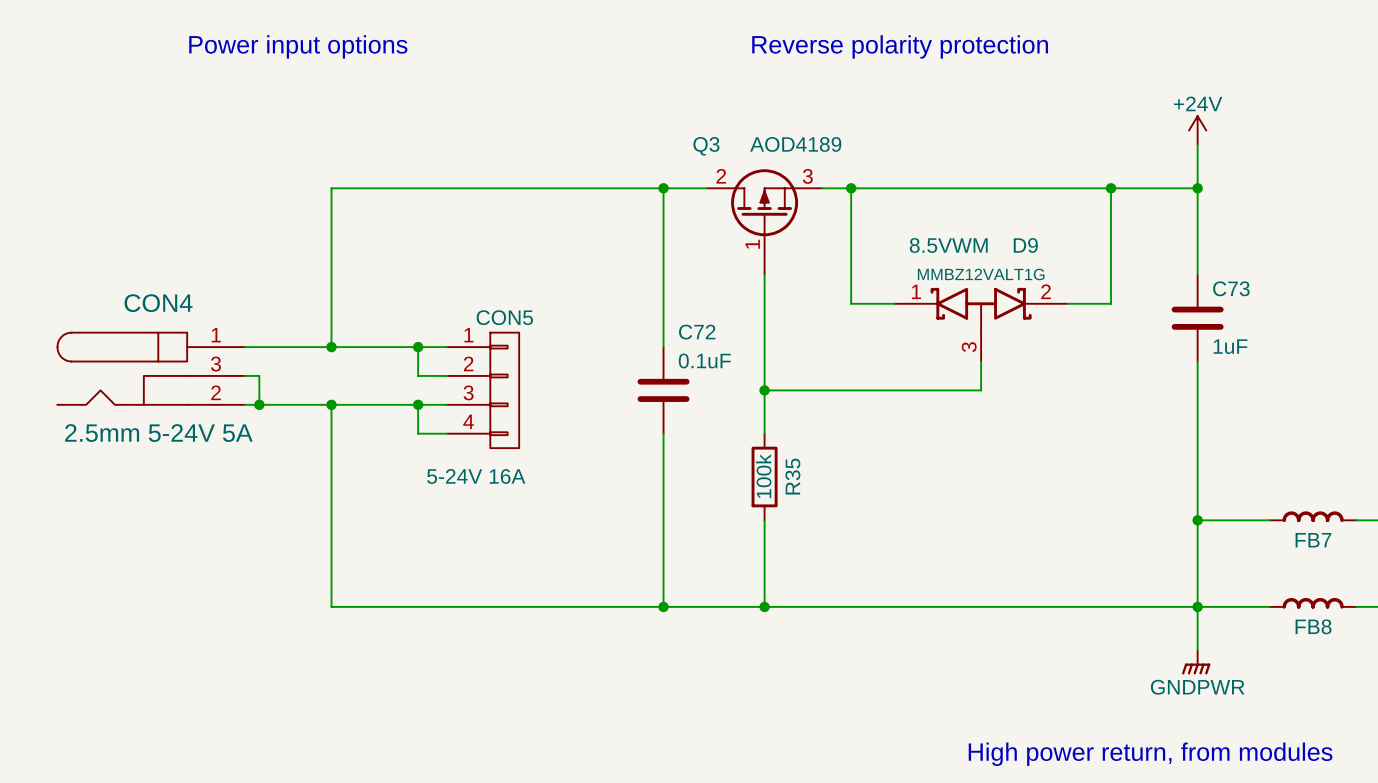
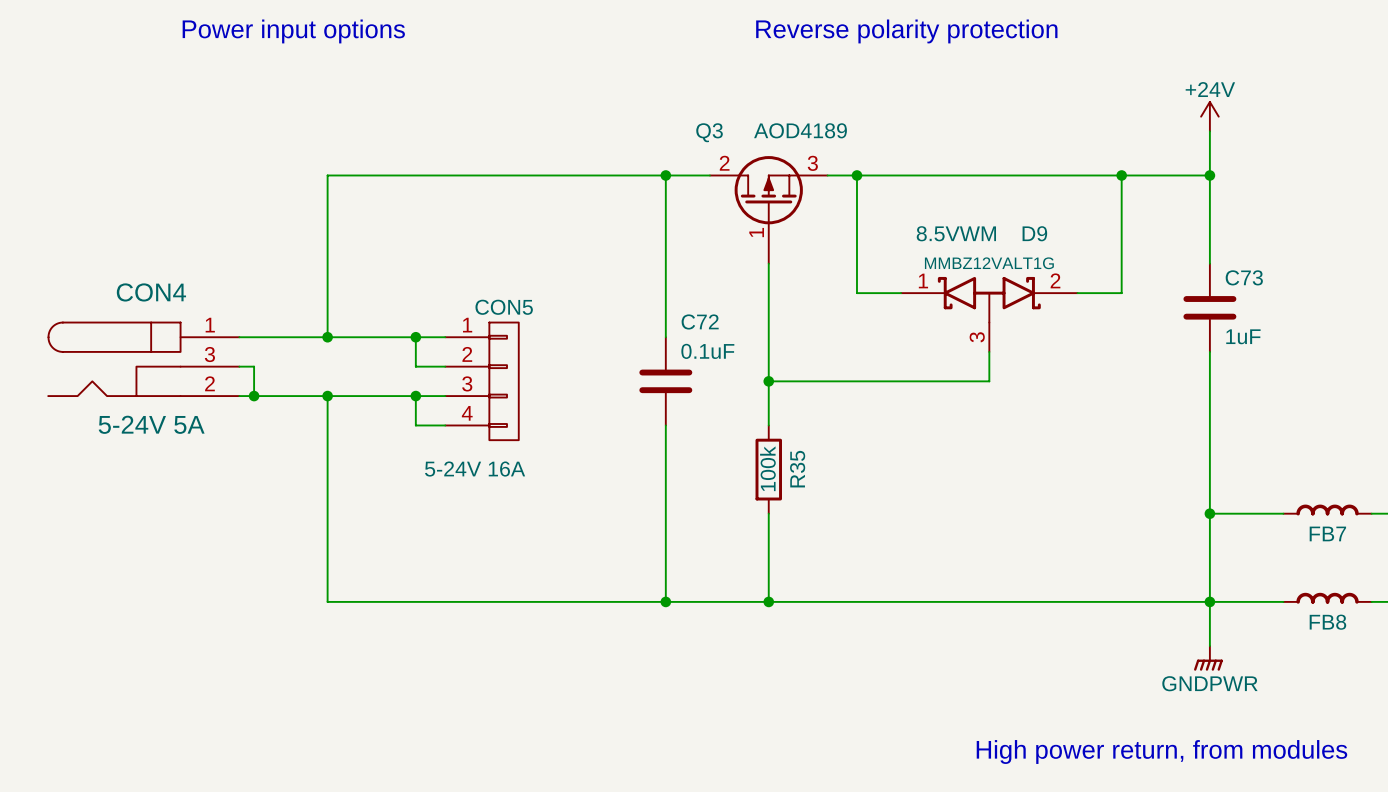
CON4 value: 2.5mm 5-24V 5A (158, 433) -> 5-24V 5A (151, 424)

